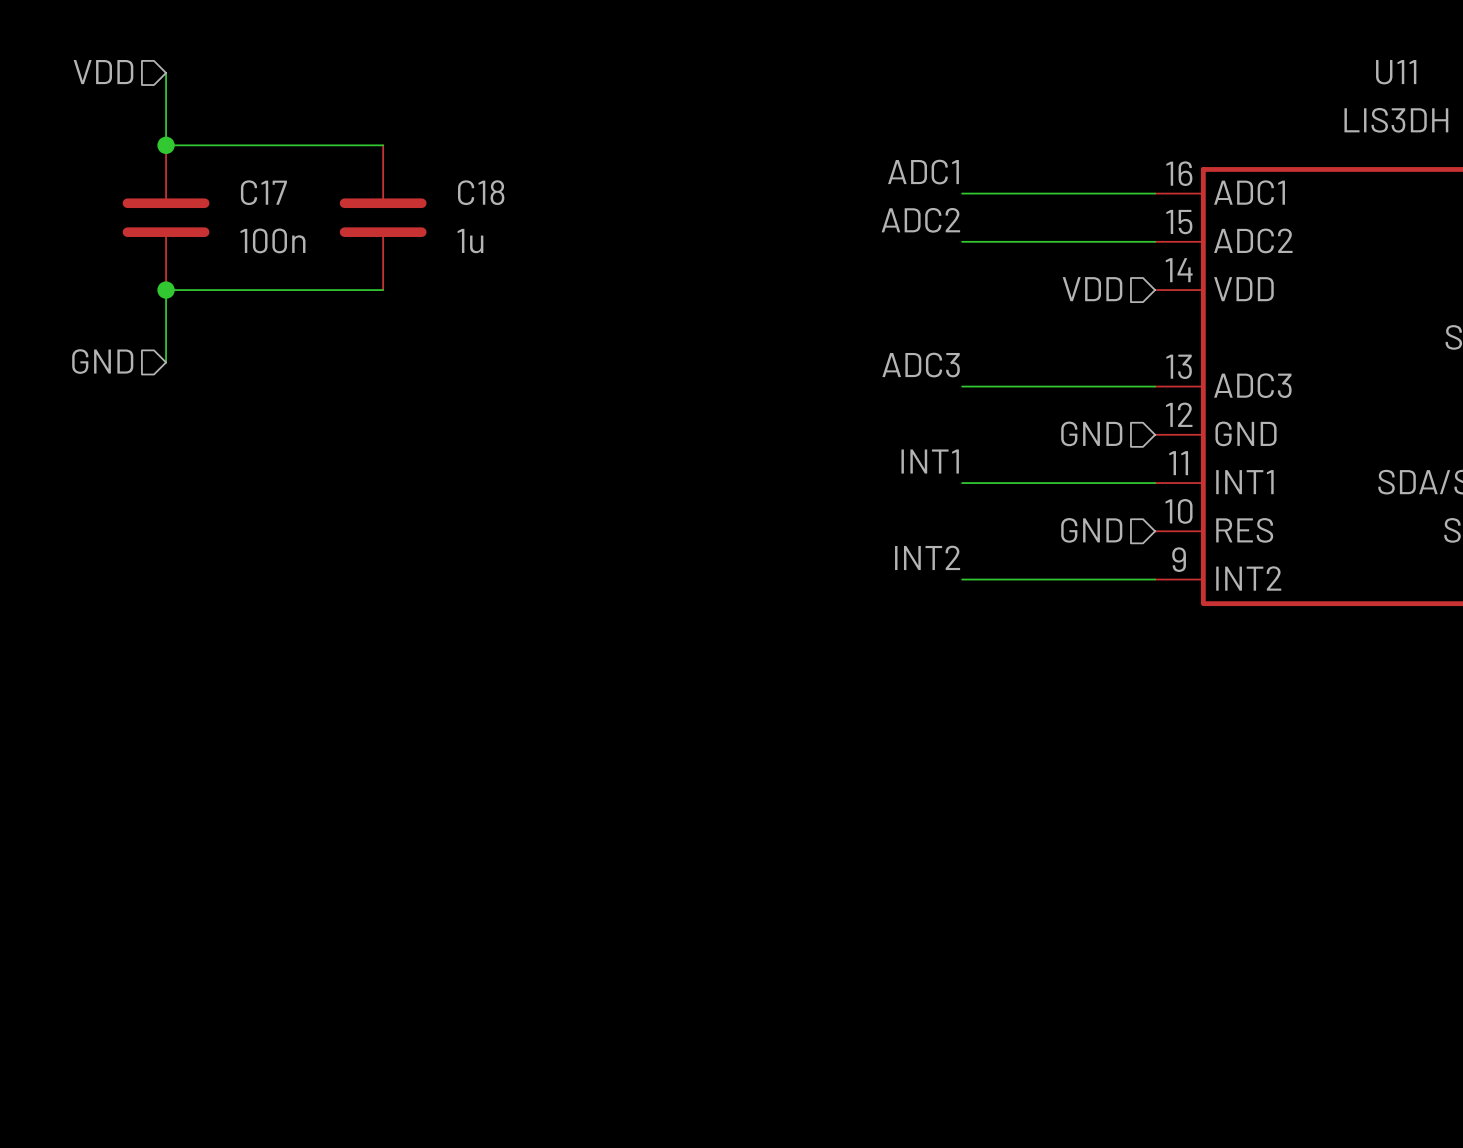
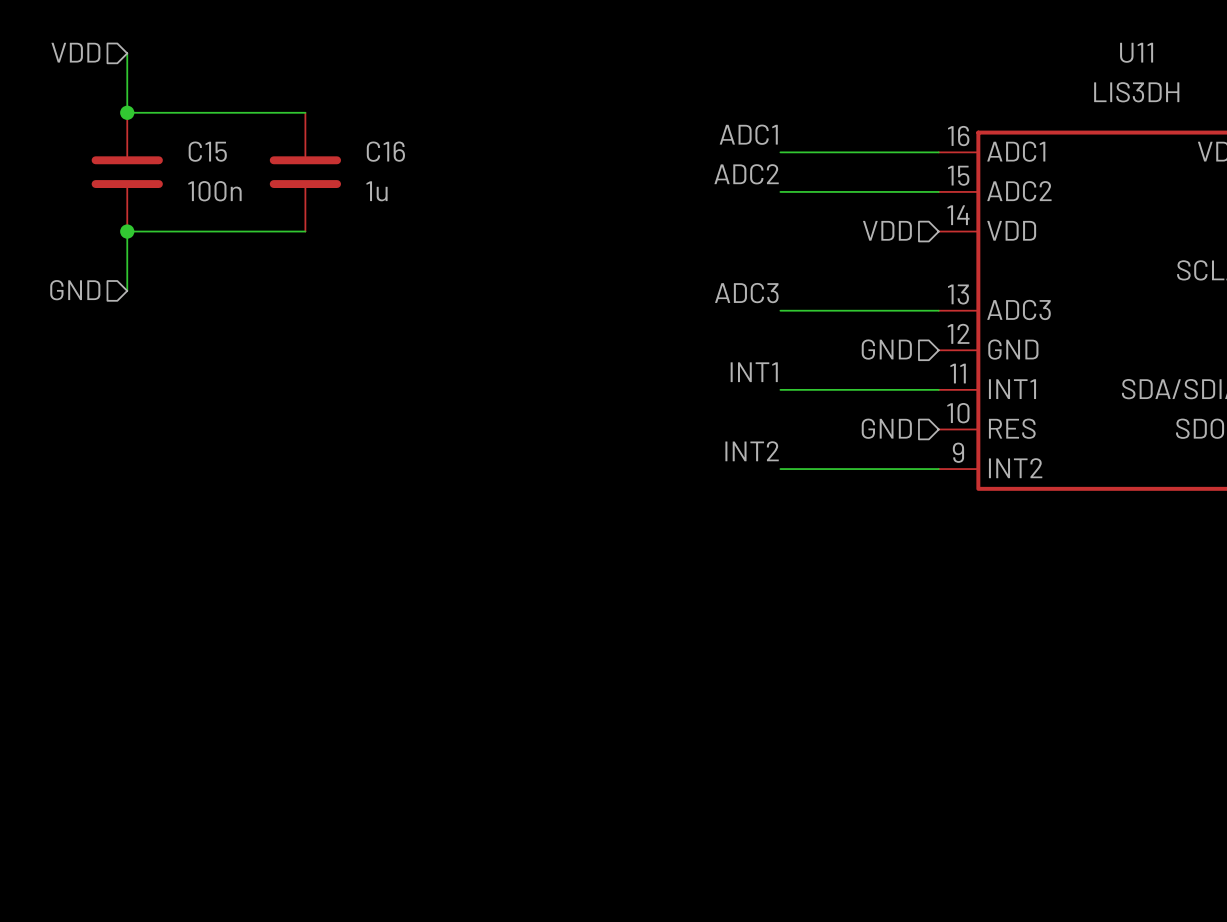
C17 name: C17 (263, 192) -> C15 (207, 151)
C18 name: C18 (481, 192) -> C16 (385, 151)

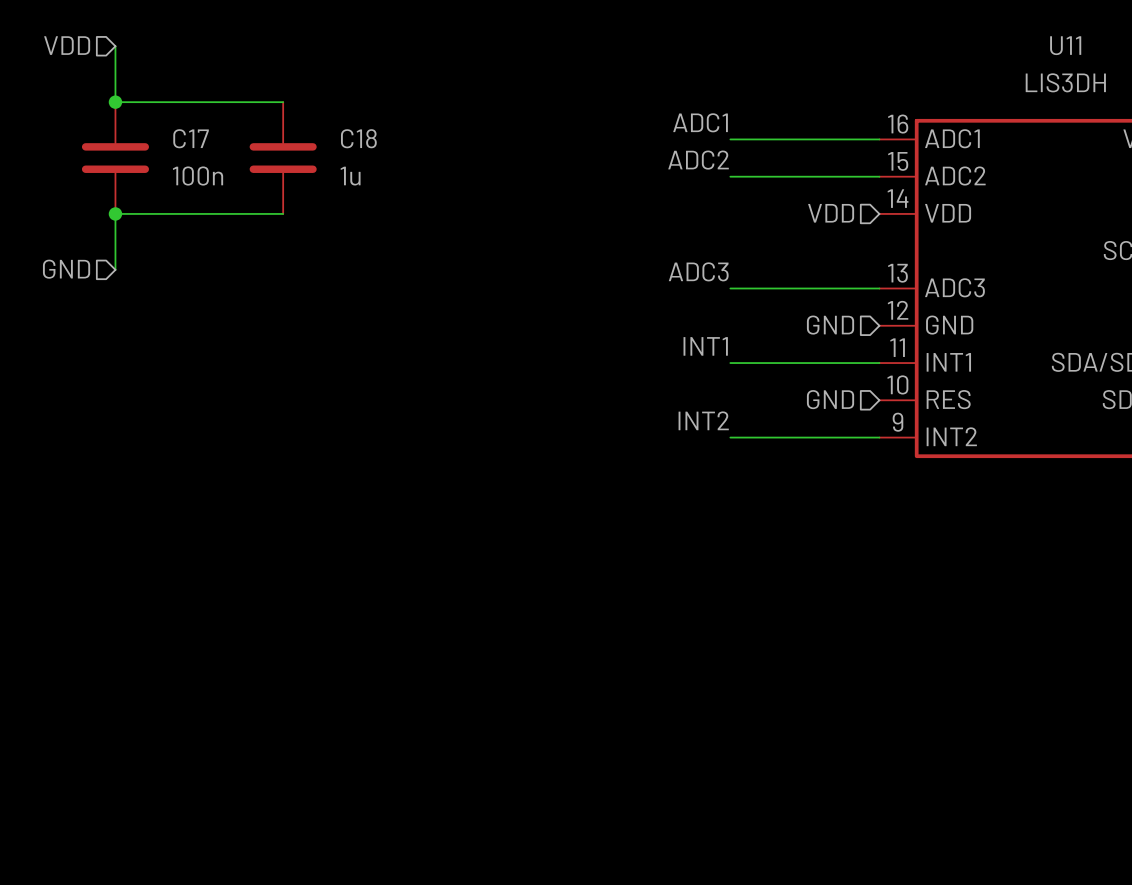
C15 name: C15 (207, 151) -> C17 (191, 138)
C16 name: C16 (385, 151) -> C18 (358, 138)

